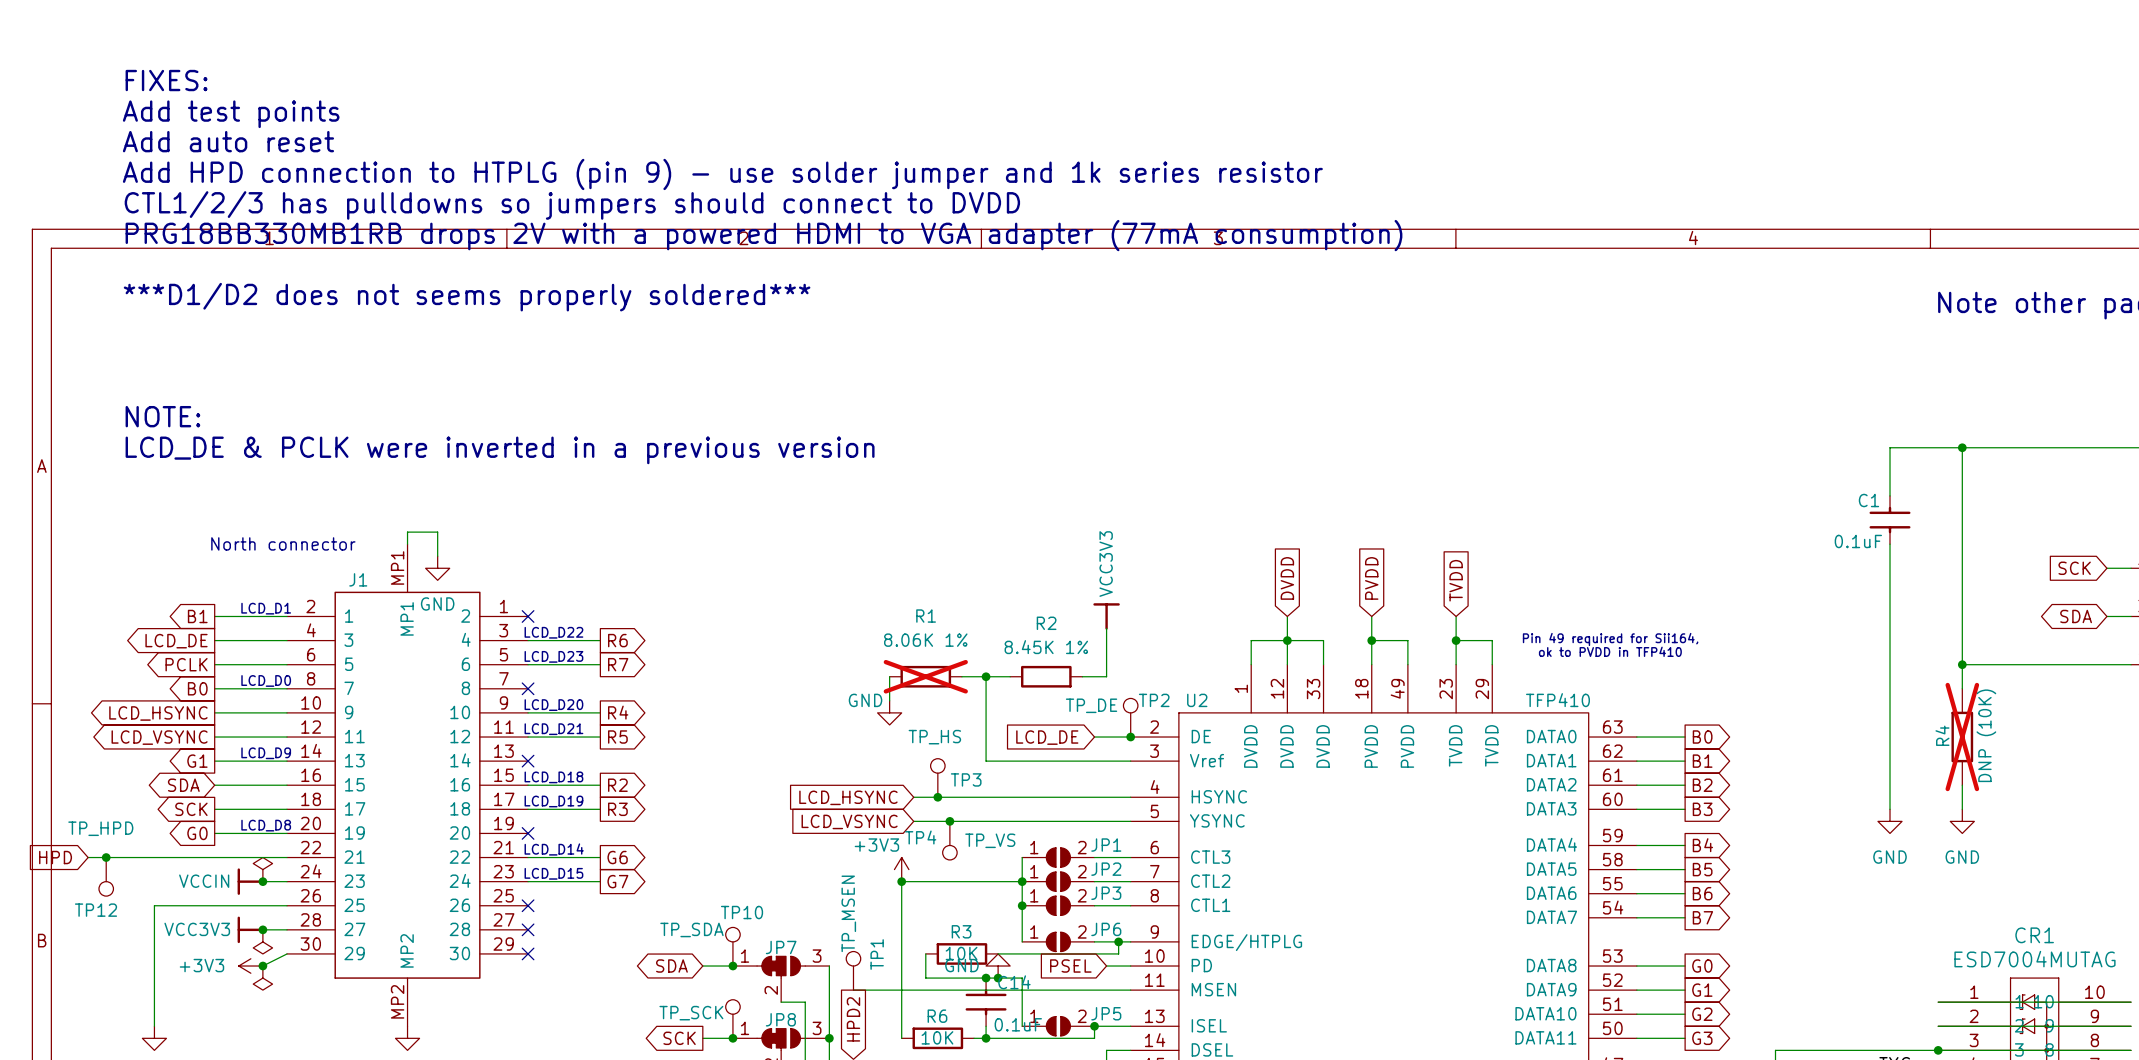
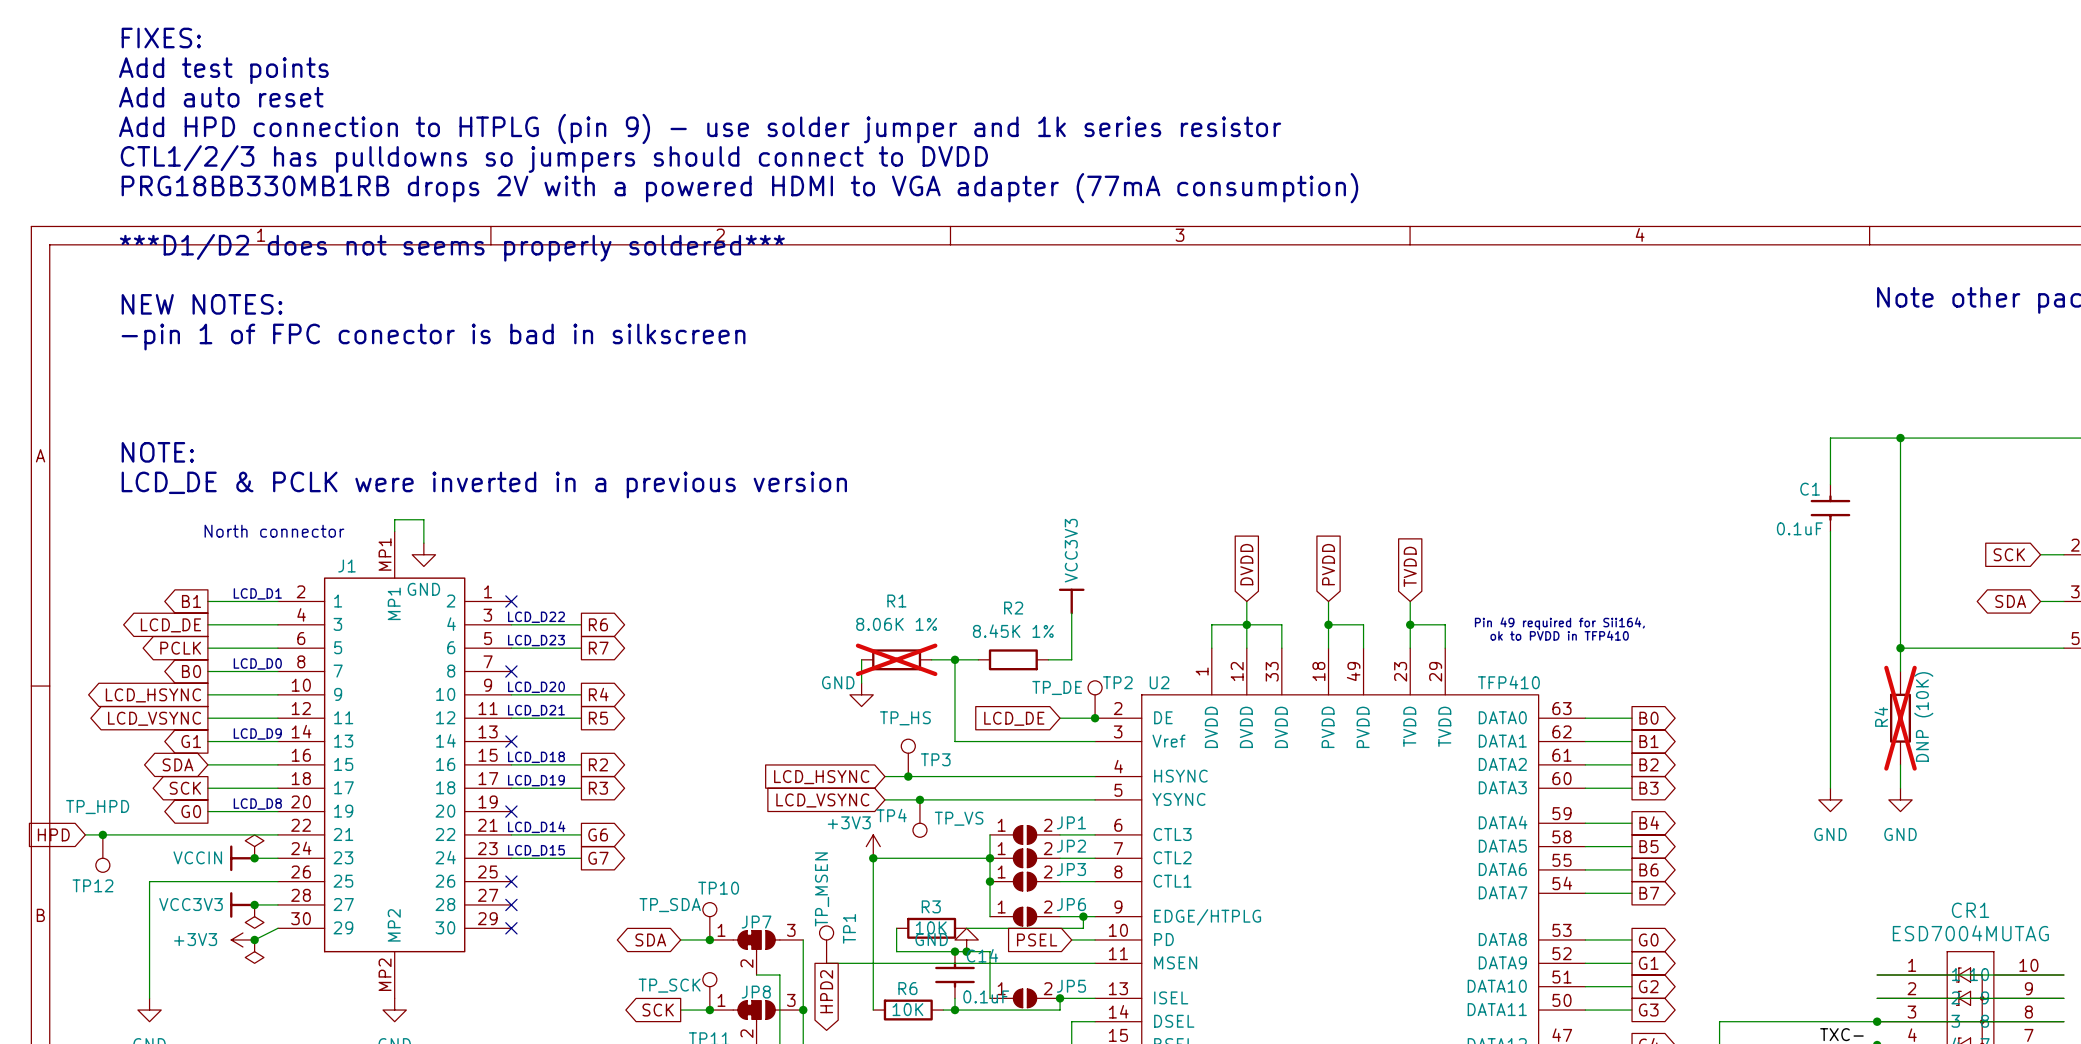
text position: FIXES: (166, 80) -> FIXES: (161, 38)
text position: Add test points (231, 114) -> Add test points (223, 70)
text position: Add auto reset (228, 141) -> Add auto reset (221, 97)
text position: Add HPD connection to HTPLG (pin 9) - use solder jumper and 1k series resistor (722, 174) -> Add HPD connection to HTPLG (pin 9) - use solder jumper and 1k series resistor (700, 128)
text position: CTL1/2/3 has pulldowns so jumpers should connect to DVDD (572, 205) -> CTL1/2/3 has pulldowns so jumpers should connect to DVDD (554, 159)
text position: PRG18BB330MB1RB drops 2V with a powered HDMI to VGA adapter (77mA consumption) (763, 235) -> PRG18BB330MB1RB drops 2V with a powered HDMI to VGA adapter (77mA consumption) (739, 188)
text position: ***D1/D2 does not seems properly soldered*** (467, 297) -> ***D1/D2 does not seems properly soldered*** (452, 247)
text: none -> NEW NOTES: (202, 304)
text: none -> -pin 1 of FPC conector is bad in silkscreen (433, 337)
text position: NOTE: (162, 416) -> NOTE: (157, 452)
text position: LCD_DE & PCLK were inverted in a previous version (500, 450) -> LCD_DE & PCLK were inverted in a previous version (484, 485)

